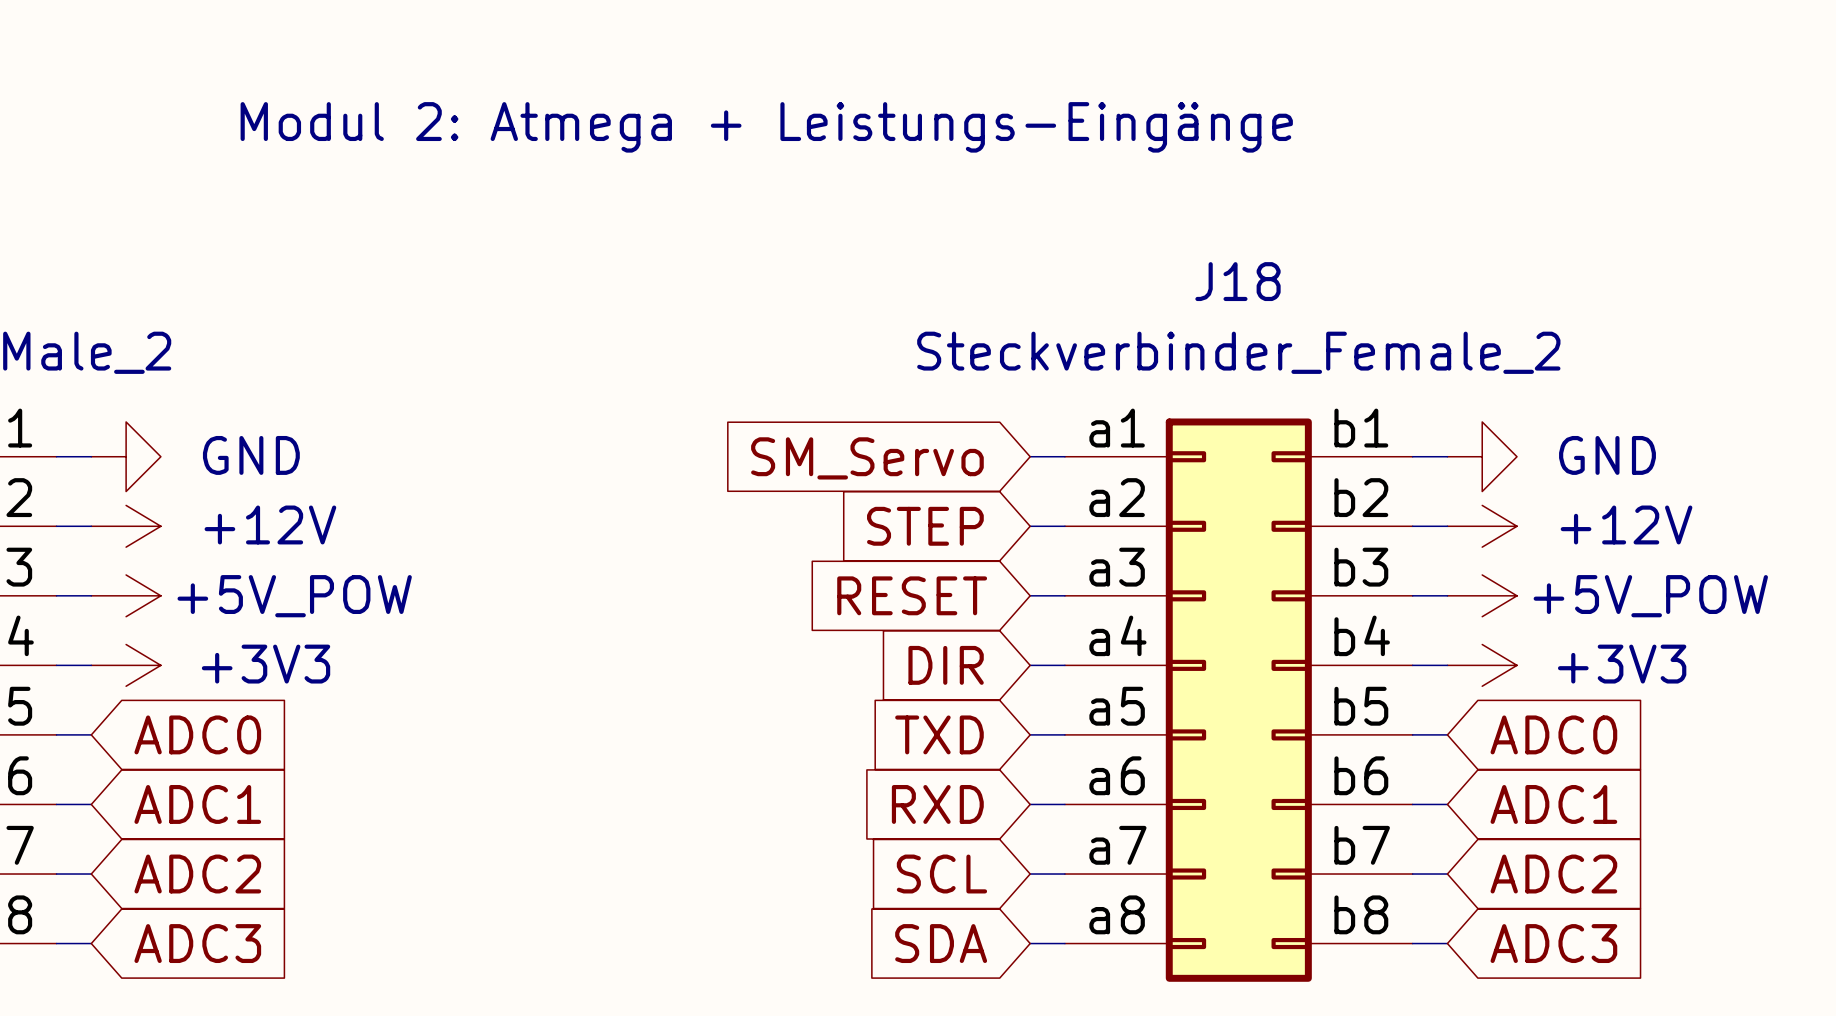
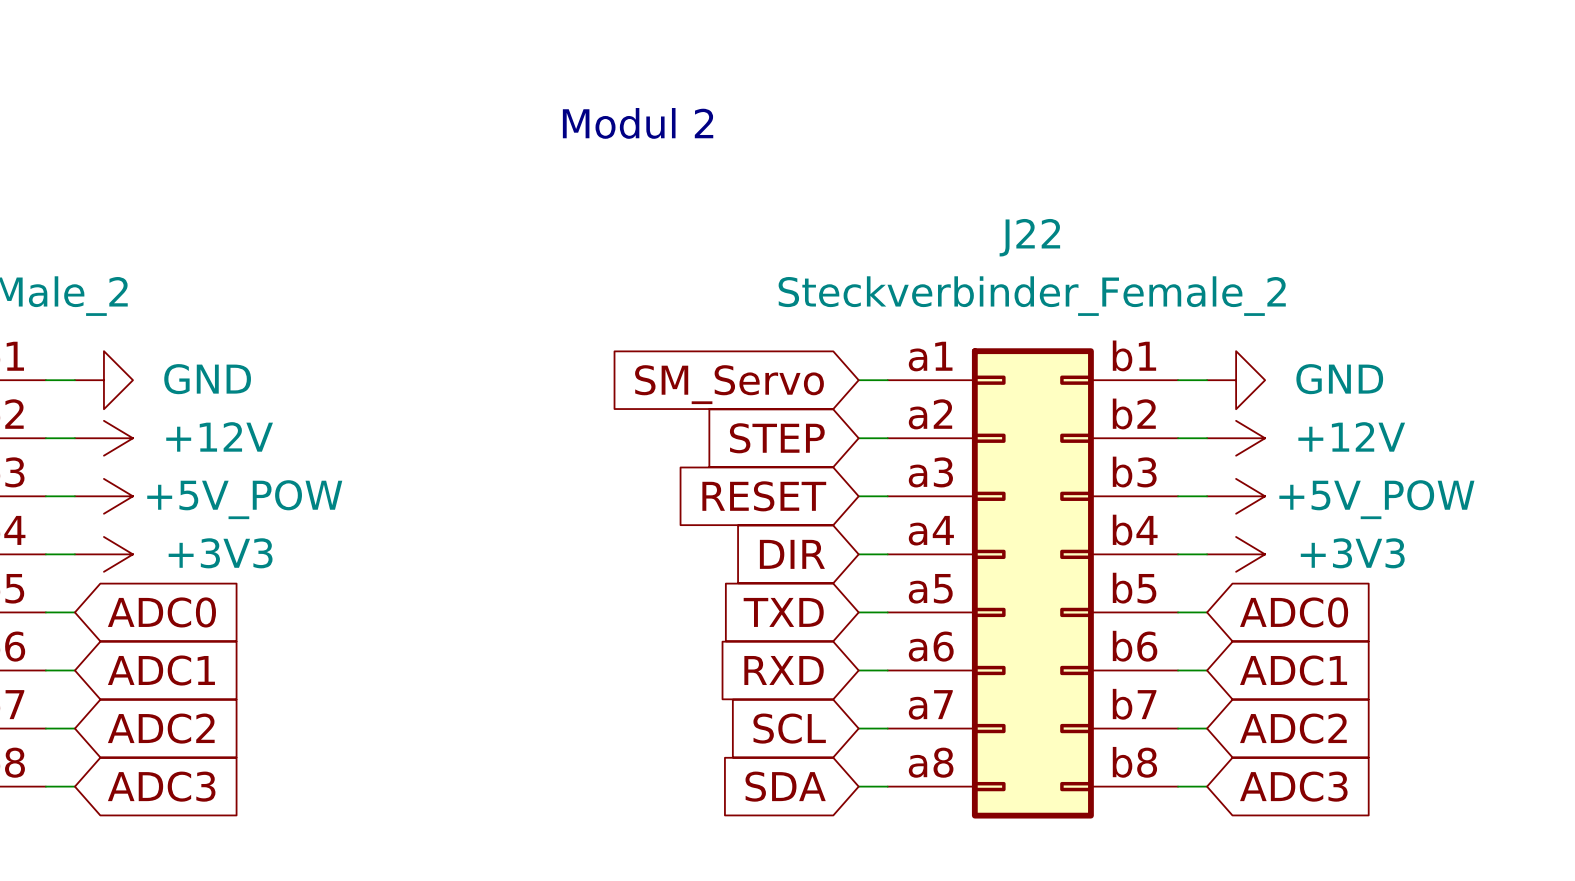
text: Modul 2: Atmega + Leistungs-Eingänge (766, 127) -> none
text: none -> Modul 2 (638, 123)
J18 name: J18 (1237, 281) -> J22 (1029, 237)

